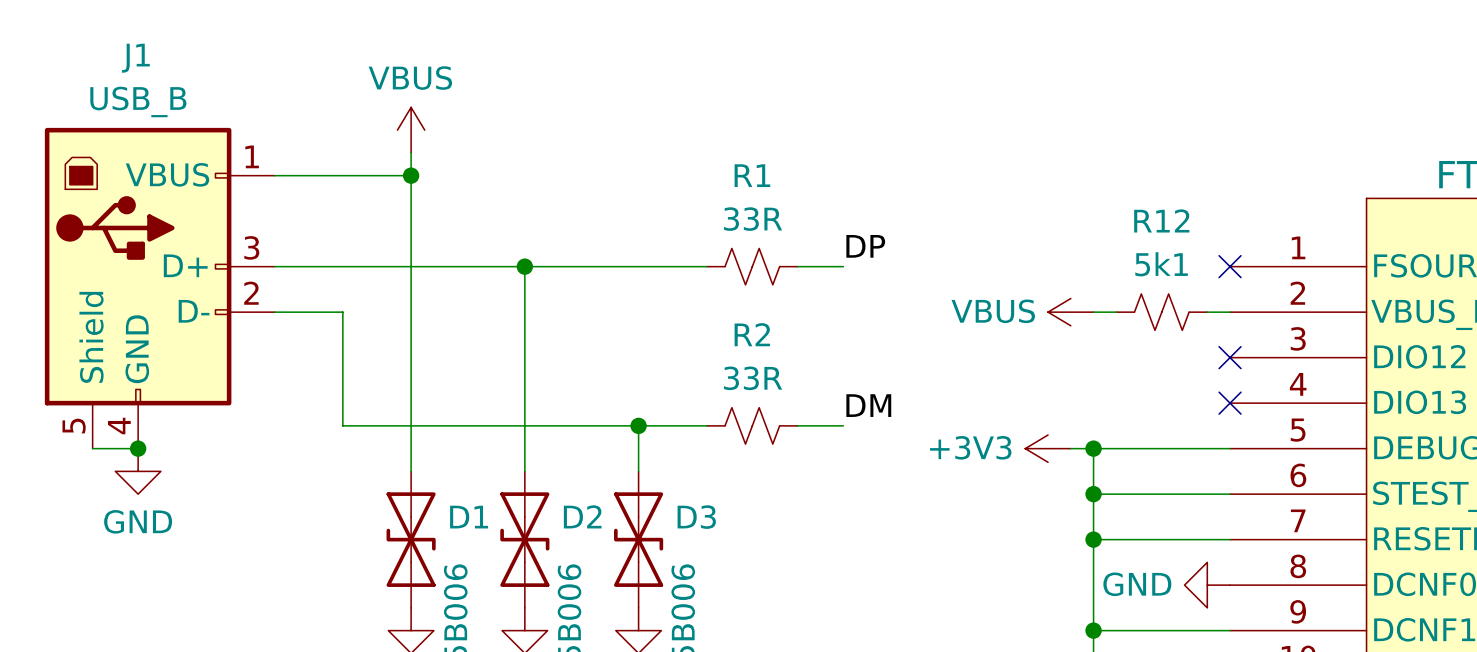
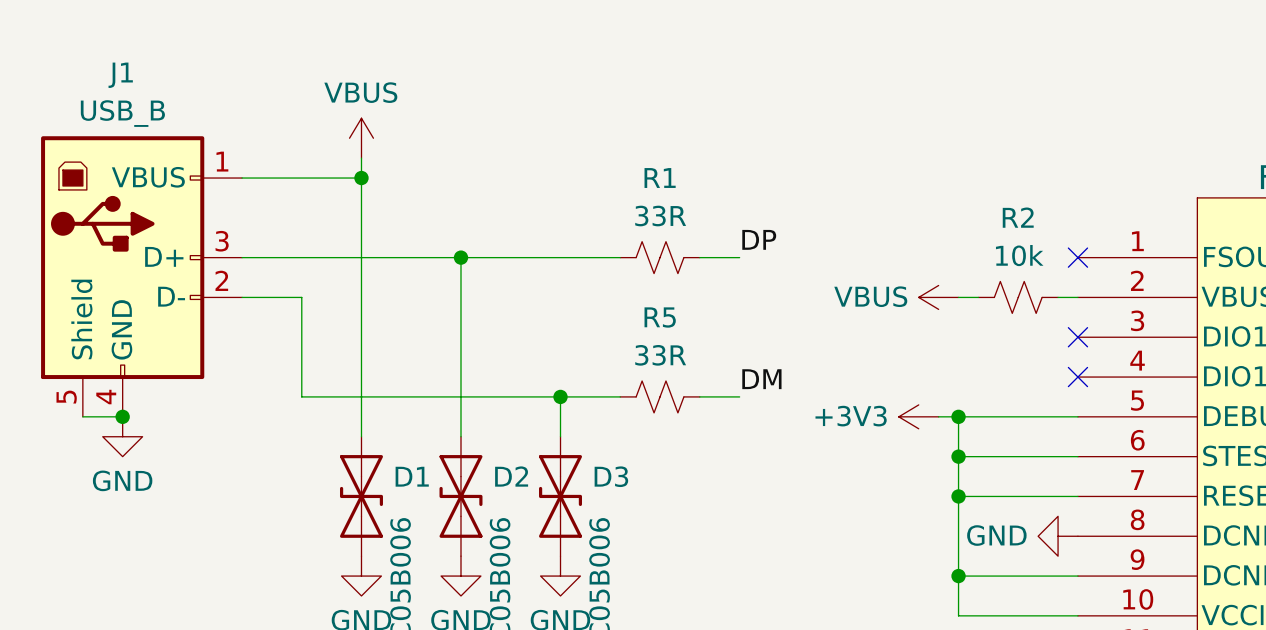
R12 name: R12 (1161, 220) -> R2 (1018, 217)
R12 value: 5k1 (1161, 264) -> 10k (1019, 255)
R2 name: R2 (752, 334) -> R5 (660, 317)

